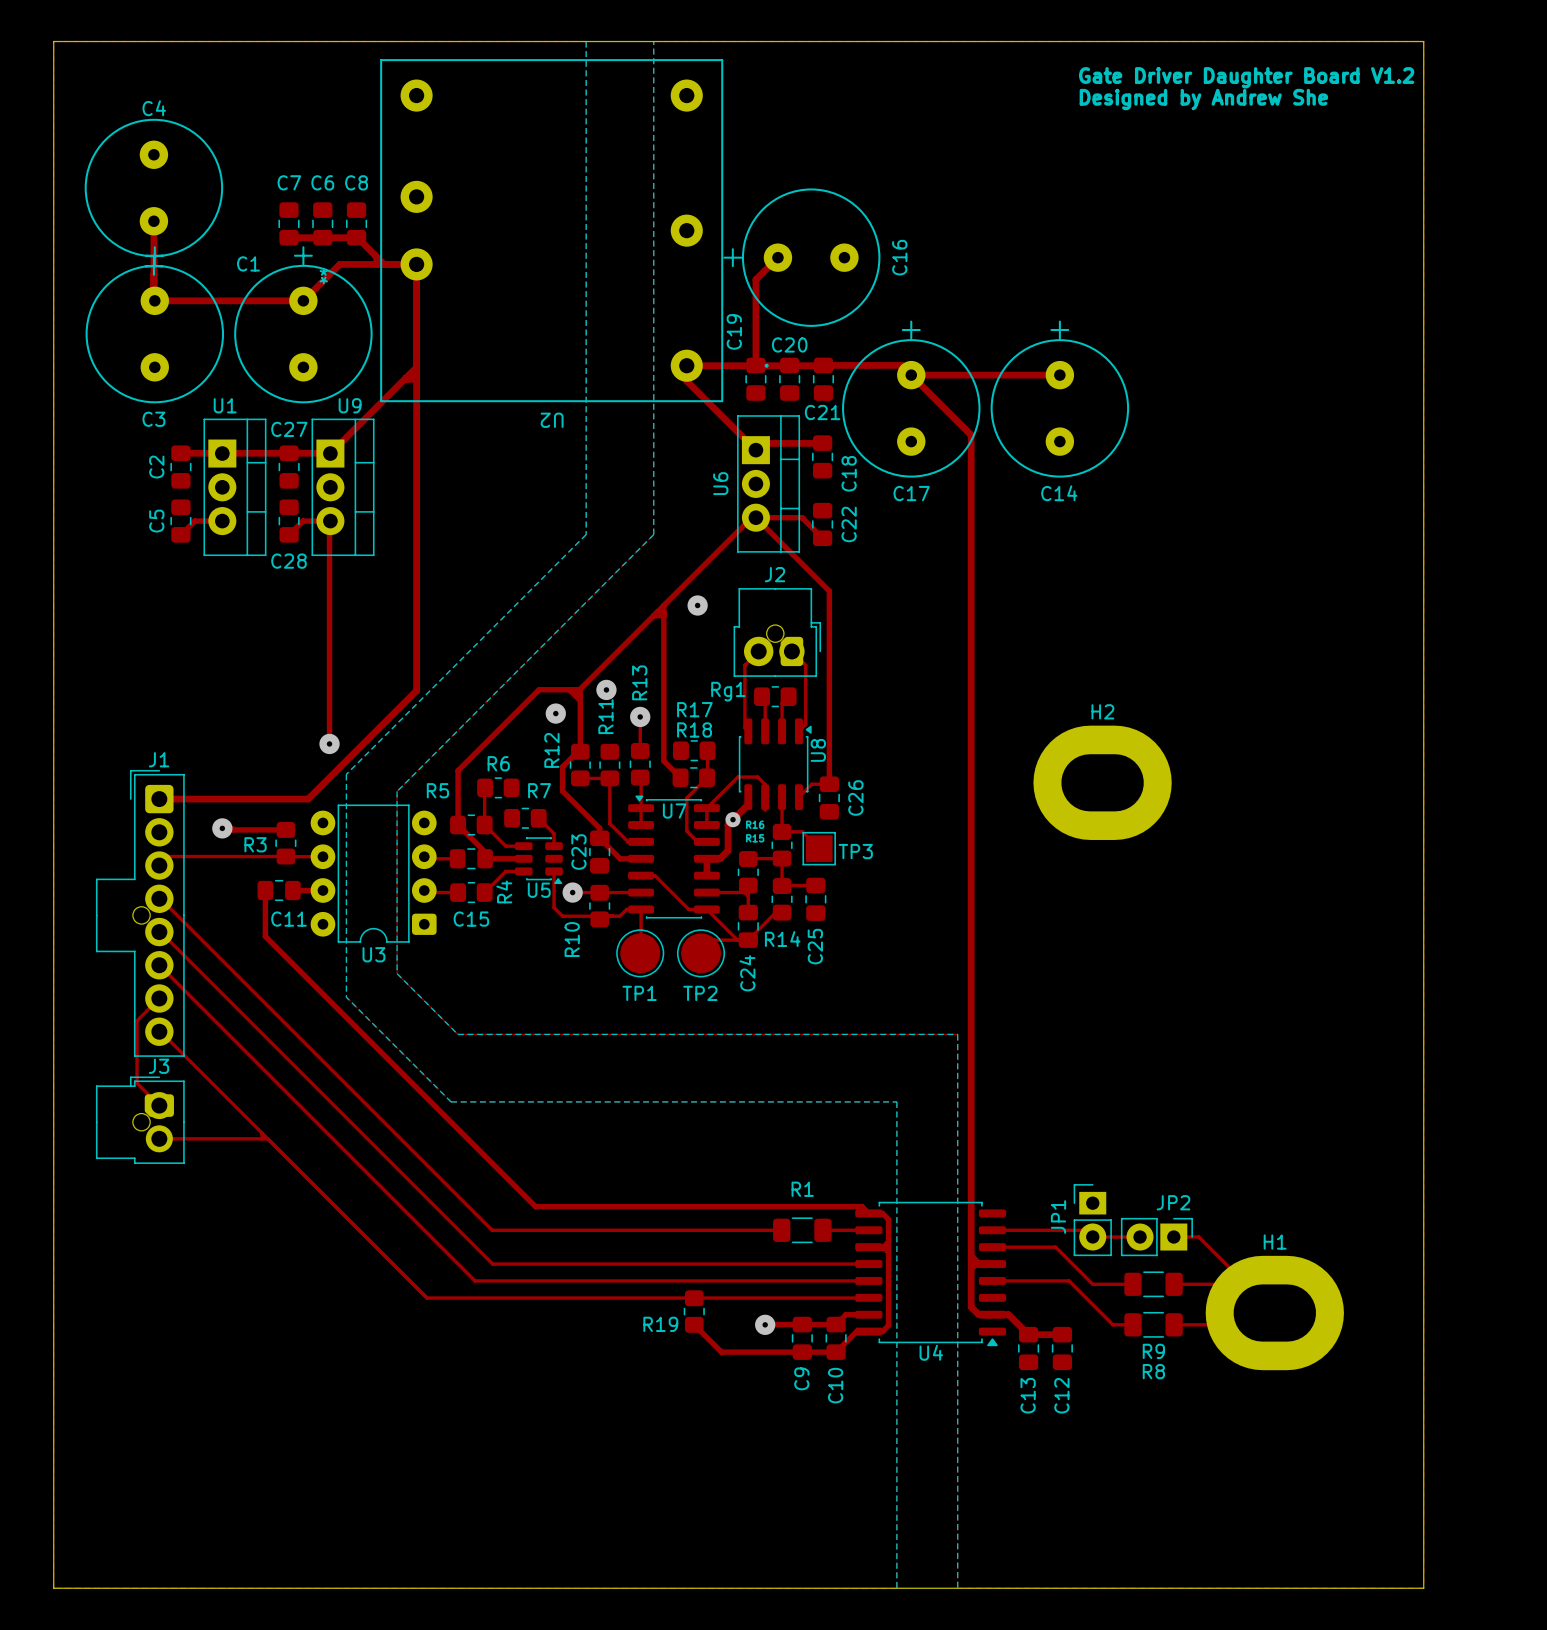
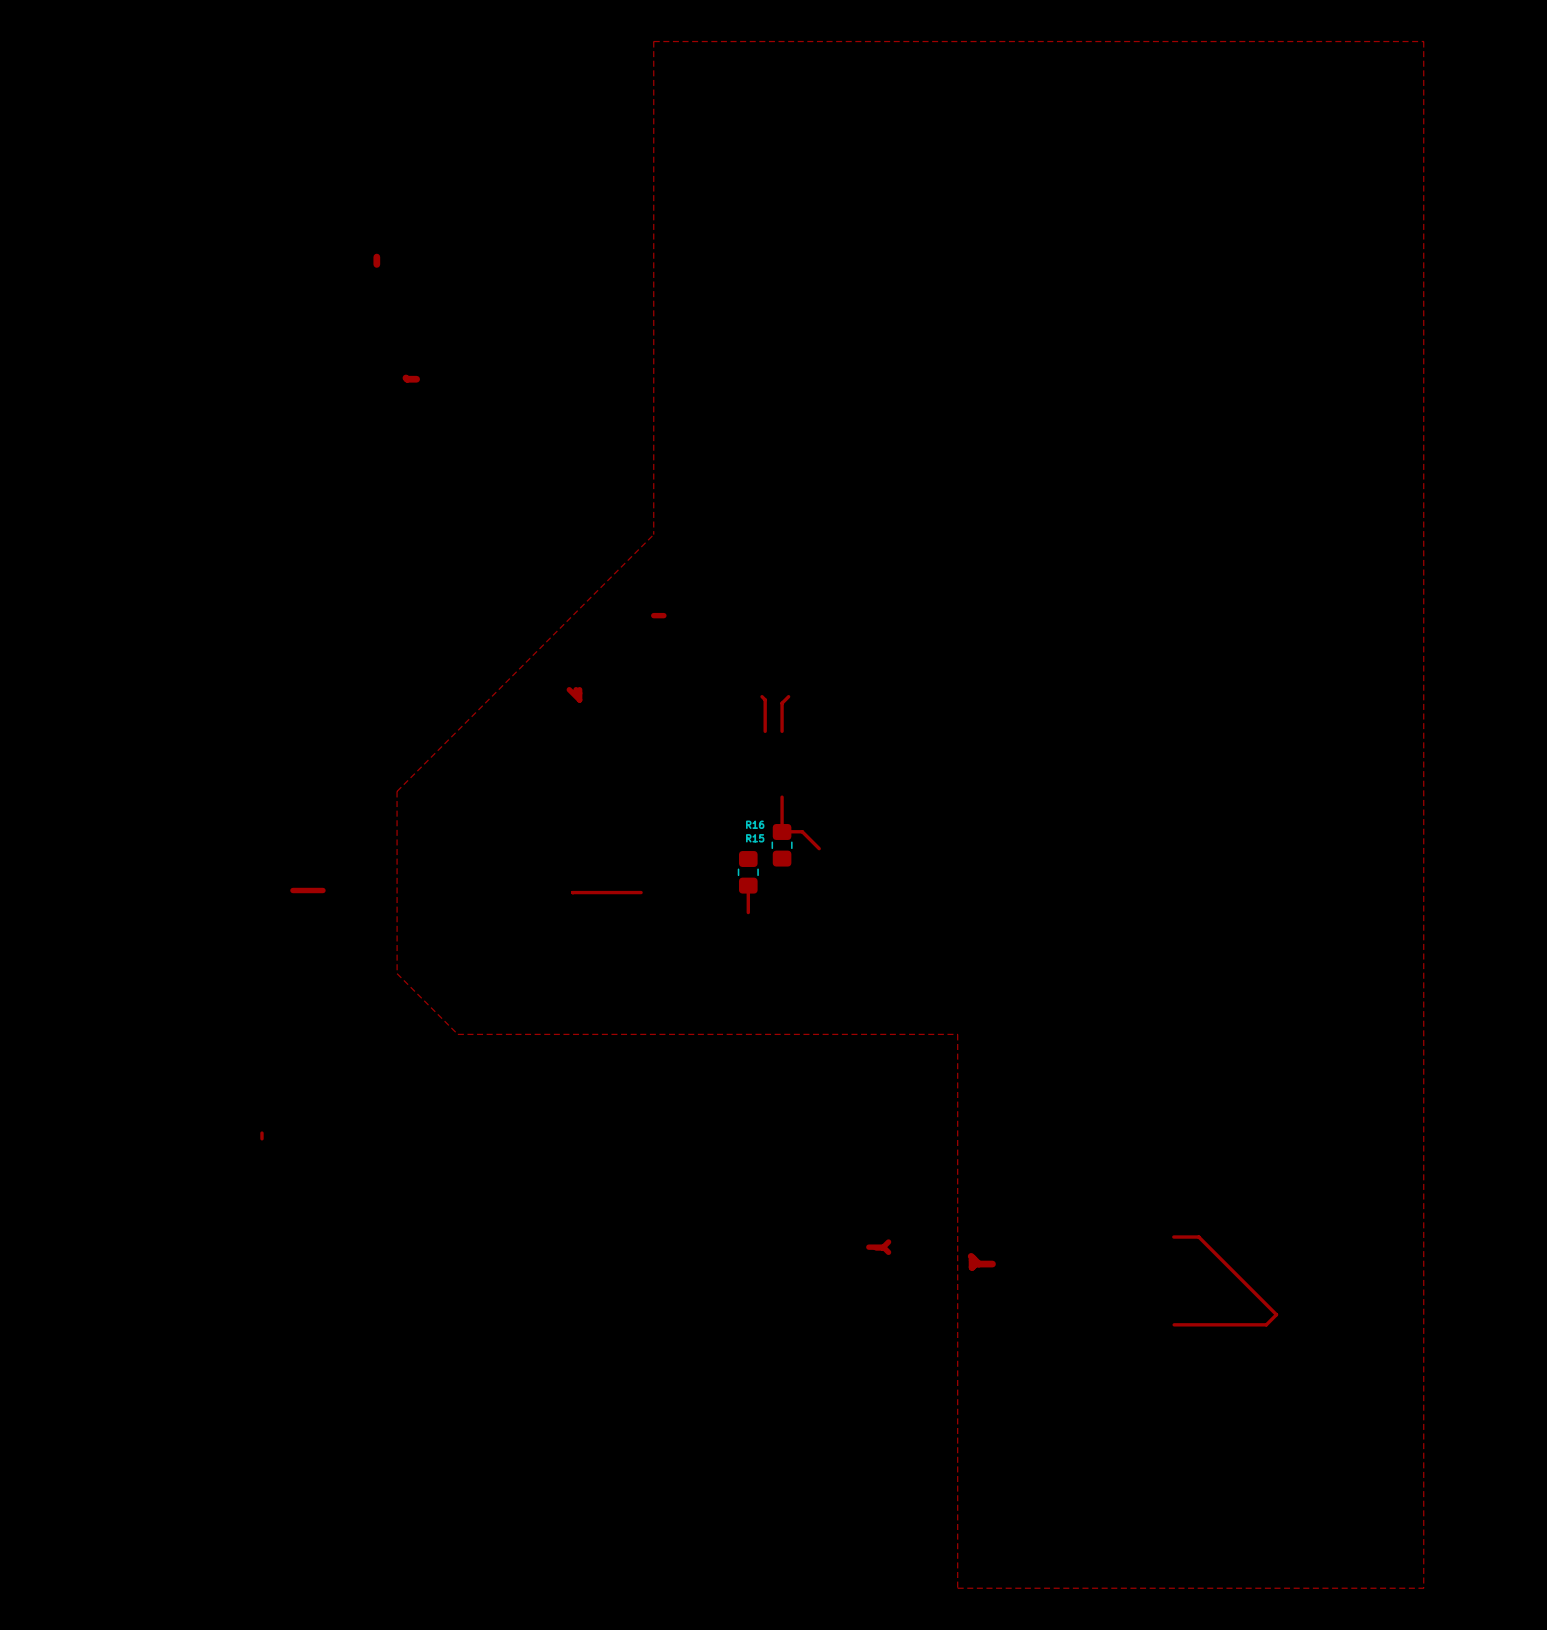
board edge: (53, 41) (1423, 41) (1423, 1588) (53, 1588) (53, 41) -> none
line: (586, 41) (586, 534) (346, 774) (346, 997) (451, 1101) (896, 1101) (896, 1588) -> none
line: (653, 41) (653, 534) (397, 791) -> none
text: Gate Driver Daughter Board V1.2 (1246, 77) -> none
text: Designed by Andrew She (1203, 99) -> none
C4: (153, 197) -> none
track: (153, 221) (154, 300) (303, 300) (339, 264) (416, 264) (416, 690) (308, 799) (159, 799) -> none
C7: (289, 223) -> none
C6: (322, 223) -> none
C8: (356, 223) -> none
U2: (574, 230) -> none
track: (289, 237) (357, 237) (384, 264) -> none
track: (777, 257) (755, 279) (755, 365) -> none
C16: (801, 257) -> none
C3: (154, 324) -> none
C1: (303, 324) -> none
track: (416, 367) (330, 453) (180, 453) -> none
track: (911, 375) (1059, 375) -> none
C19: (755, 379) -> none
C20: (789, 379) -> none
C21: (823, 379) -> none
C17: (911, 399) -> none
C14: (1059, 399) -> none
track: (822, 443) (762, 443) (755, 450) (686, 381) (686, 365) (901, 365) (971, 435) (971, 1307) (978, 1314) (1008, 1314) (1028, 1334) (1062, 1334) -> none
C18: (822, 456) -> none
C2: (180, 467) -> none
C27: (289, 467) -> none
U6: (768, 483) -> none
U1: (234, 487) -> none
U9: (343, 487) -> none
track: (755, 517) (829, 591) (829, 784) (811, 784) (798, 797) -> none
C5: (180, 521) -> none
track: (222, 521) (194, 521) (180, 534) -> none
C28: (289, 521) -> none
C22: (822, 524) -> none
track: (289, 534) (302, 521) (330, 521) (329, 743) -> none
track: (822, 538) (802, 517) (751, 517) (579, 689) -> none
track: (663, 605) (663, 761) (680, 777) -> none
via: (697, 605) -> none
J2: (777, 632) -> none
track: (758, 651) (744, 665) (744, 727) (748, 731) -> none
track: (791, 651) (805, 665) (805, 724) (798, 731) -> none
track: (579, 689) (580, 751) (577, 751) (562, 766) (562, 791) (599, 828) (599, 838) (620, 858) (641, 858) -> none
track: (579, 689) (539, 689) (458, 770) (458, 825) (485, 852) (485, 858) (523, 858) -> none
via: (606, 689) -> none
Rg1: (775, 696) -> none
via: (555, 713) -> none
track: (640, 716) (640, 750) -> none
via: (640, 716) -> none
via: (329, 743) -> none
R18: (694, 750) -> none
track: (707, 750) (707, 777) (686, 798) (686, 831) (697, 841) (706, 841) -> none
R11: (640, 764) -> none
U8: (775, 764) -> none
R12: (580, 765) -> none
R13: (609, 765) -> none
R17: (693, 777) -> none
track: (580, 778) (609, 778) (609, 823) (628, 841) (641, 841) -> none
track: (641, 778) (641, 825) -> none
H2: (1102, 782) -> none
R6: (498, 787) -> none
line: (397, 791) (397, 973) (457, 1034) (957, 1034) (957, 1588) -> none
track: (484, 791) (484, 825) (505, 846) (523, 846) -> none
track: (748, 797) (748, 804) (728, 824) (728, 850) (719, 858) (706, 858) (706, 875) -> none
C26: (829, 798) -> none
track: (765, 810) (765, 784) (757, 777) (737, 777) (706, 808) (706, 825) -> none
R7: (525, 818) -> none
track: (538, 818) (554, 833) (554, 846) (552, 844) -> none
via: (733, 819) -> none
R5: (471, 825) -> none
track: (222, 828) (285, 829) -> none
via: (222, 828) -> none
R3: (285, 843) -> none
TP3: (819, 848) -> none
C23: (599, 852) -> none
track: (285, 856) (168, 856) (159, 865) -> none
track: (286, 856) (322, 856) -> none
U7: (673, 857) -> none
track: (426, 858) (457, 858) -> none
C15: (471, 858) -> none
track: (748, 859) (782, 858) (782, 886) (815, 885) -> none
U5: (538, 860) -> none
track: (523, 871) (505, 871) (484, 892) -> none
track: (554, 871) (554, 907) (562, 916) (619, 916) (626, 909) (641, 909) (640, 953) (640, 943) -> none
U3: (373, 873) -> none
track: (641, 875) (655, 875) (688, 909) (706, 909) (737, 940) -> none
track: (265, 890) (265, 936) (535, 1206) (862, 1206) (868, 1213) (882, 1213) (888, 1219) (888, 1325) (882, 1331) (856, 1331) (836, 1352) (721, 1352) (694, 1324) -> none
C11: (279, 890) -> none
track: (426, 892) (458, 892) -> none
R4: (471, 892) -> none
via: (572, 892) -> none
track: (706, 892) (744, 892) (748, 895) -> none
track: (160, 898) (492, 1230) (781, 1230) -> none
R14: (782, 899) -> none
C25: (815, 899) -> none
R10: (599, 906) -> none
track: (782, 912) (775, 912) (748, 940) (714, 940) (701, 953) -> none
J1: (140, 913) -> none
C24: (748, 926) -> none
track: (160, 932) (492, 1264) (868, 1264) -> none
TP1: (640, 953) -> none
TP2: (701, 953) -> none
track: (159, 965) (475, 1280) (868, 1280) -> none
track: (159, 998) (137, 1020) (137, 1083) (159, 1105) -> none
track: (160, 1031) (426, 1298) (868, 1297) -> none
J3: (140, 1120) -> none
track: (159, 1138) (267, 1138) -> none
JP1: (1092, 1220) -> none
R1: (802, 1230) -> none
track: (822, 1230) (868, 1230) -> none
track: (992, 1230) (1086, 1230) (1092, 1236) (1096, 1236) -> none
track: (1096, 1237) (1140, 1237) -> none
JP2: (1156, 1237) -> none
track: (992, 1247) (1055, 1247) (1092, 1284) (1132, 1284) -> none
U4: (930, 1273) -> none
track: (992, 1280) (1069, 1280) (1113, 1324) (1132, 1324) -> none
R9: (1153, 1284) -> none
track: (1174, 1284) (1246, 1284) -> none
R19: (694, 1311) -> none
H1: (1274, 1313) -> none
track: (868, 1314) (845, 1314) (836, 1324) (765, 1324) -> none
via: (765, 1324) -> none
R8: (1153, 1324) -> none
C9: (802, 1338) -> none
C10: (836, 1338) -> none
C13: (1028, 1348) -> none
C12: (1062, 1348) -> none

